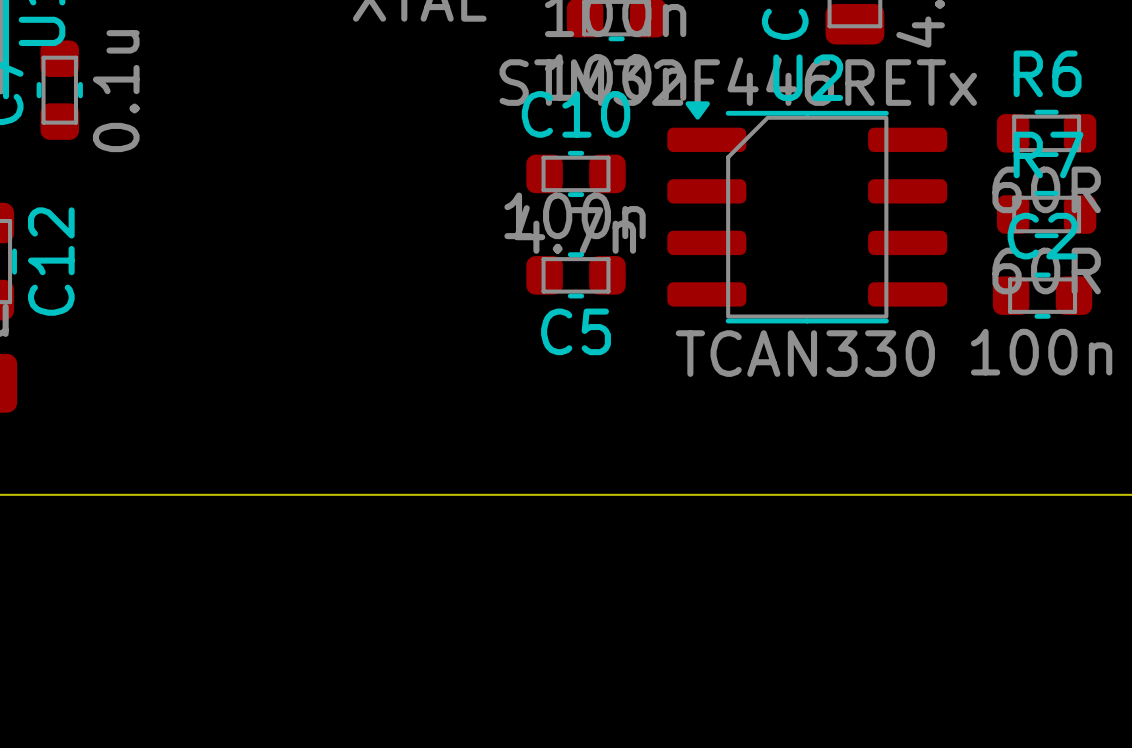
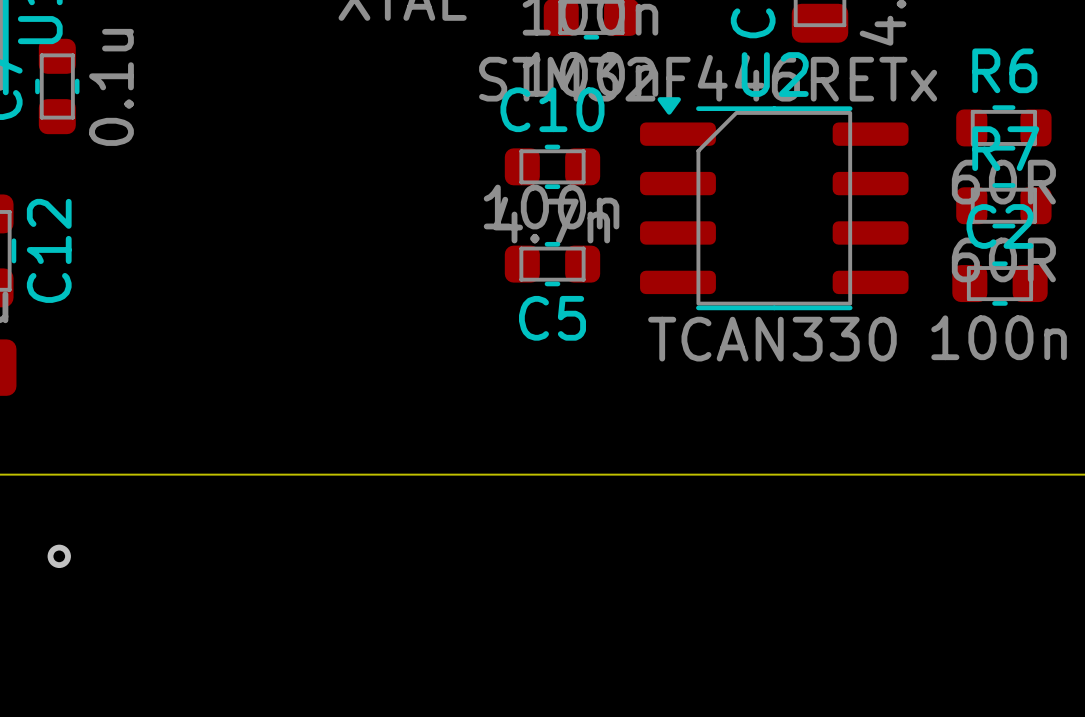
via: none -> (59, 556)

